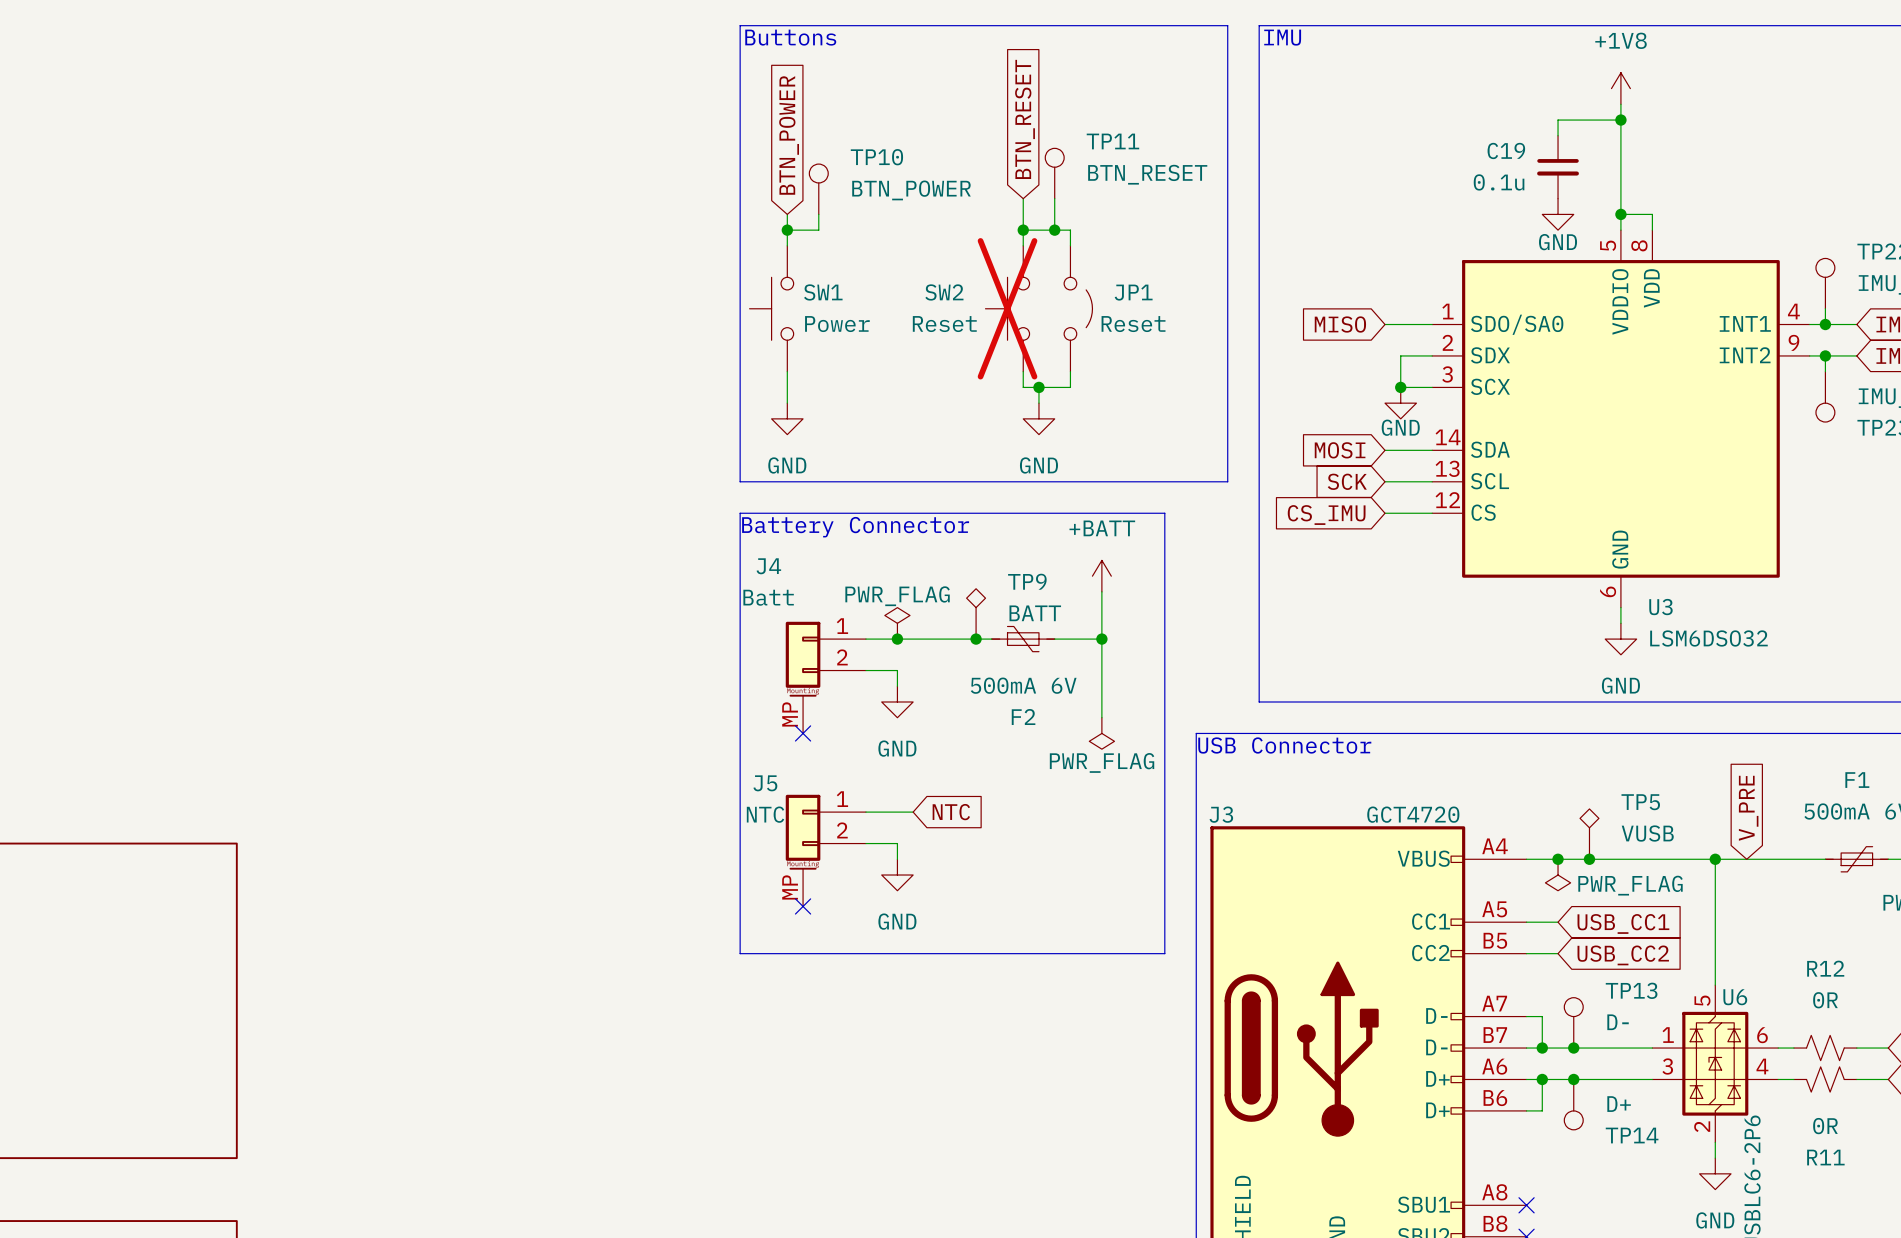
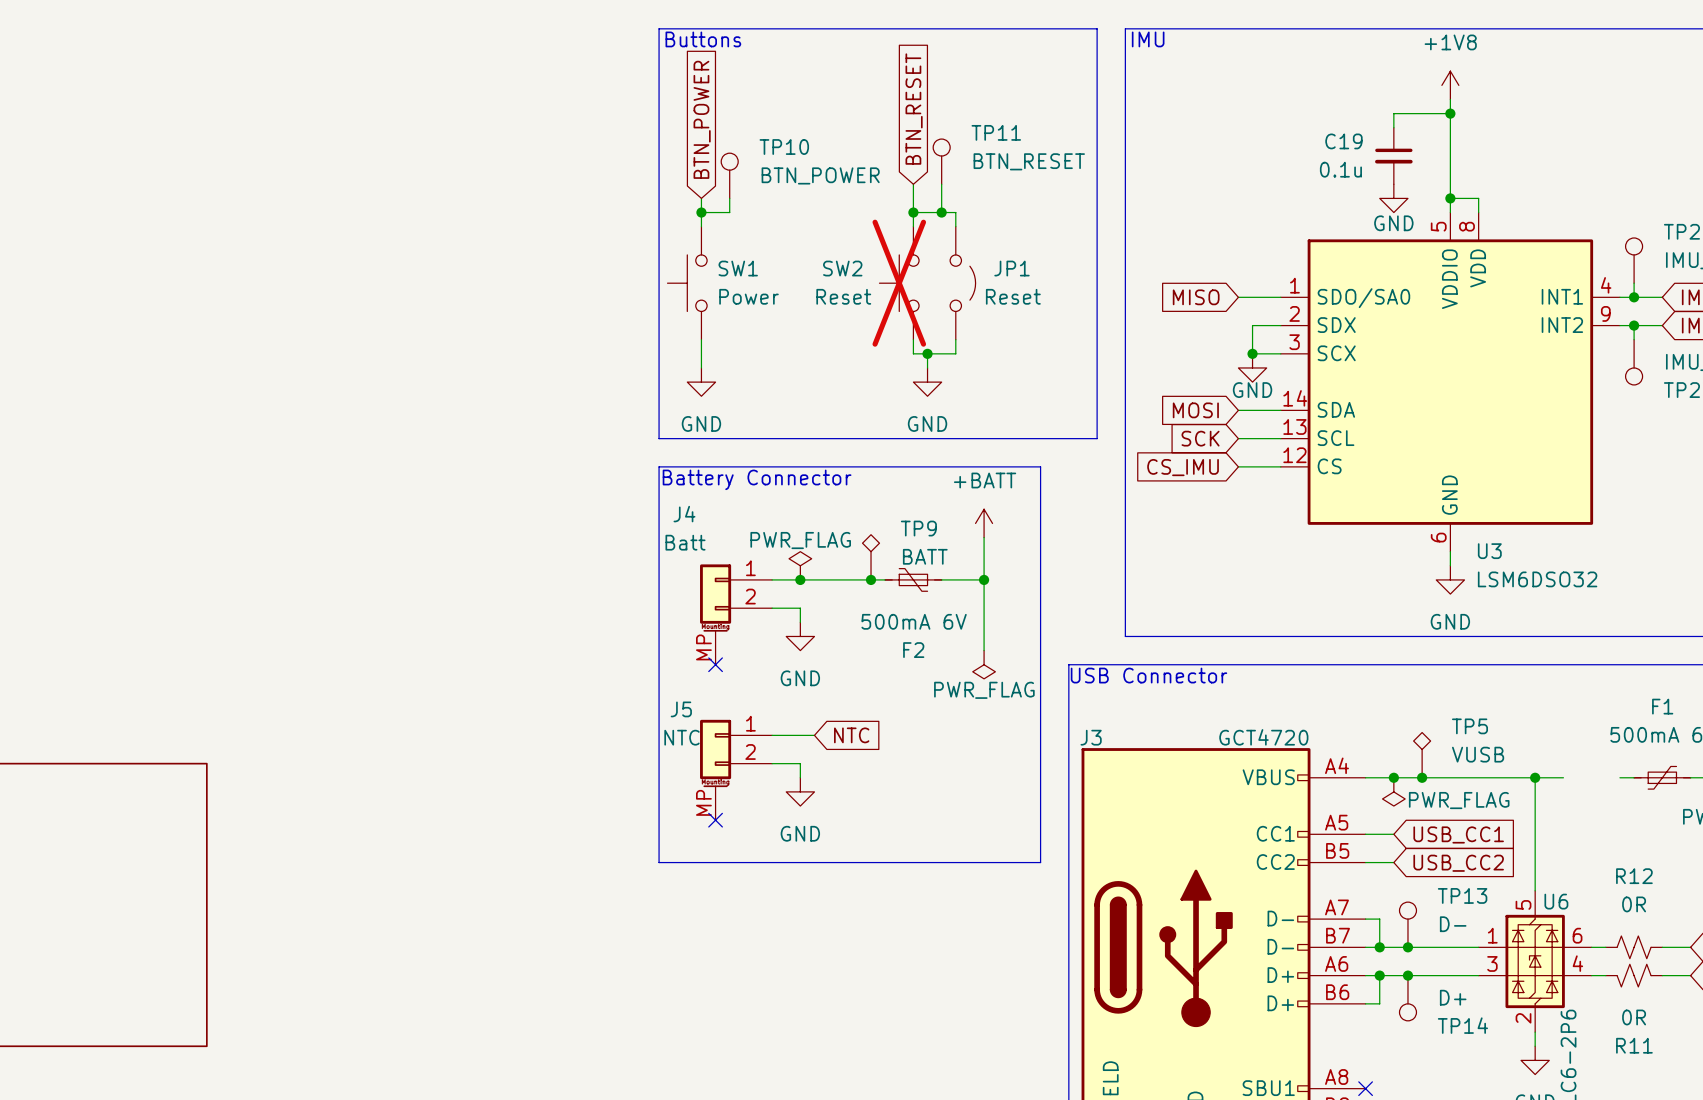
global label: V_PRE (1748, 808) -> none
wire: (1746, 859) (1809, 859) -> none

